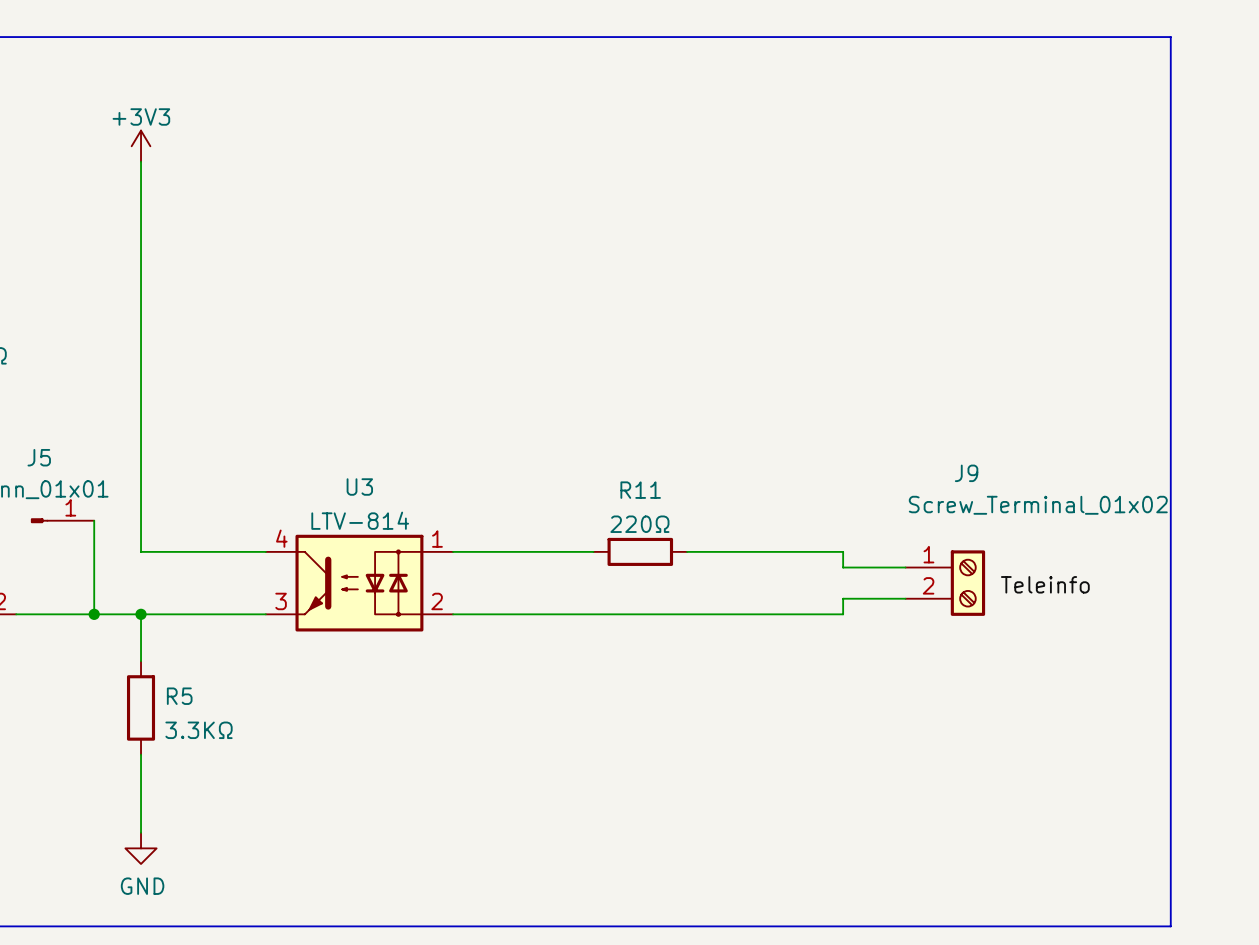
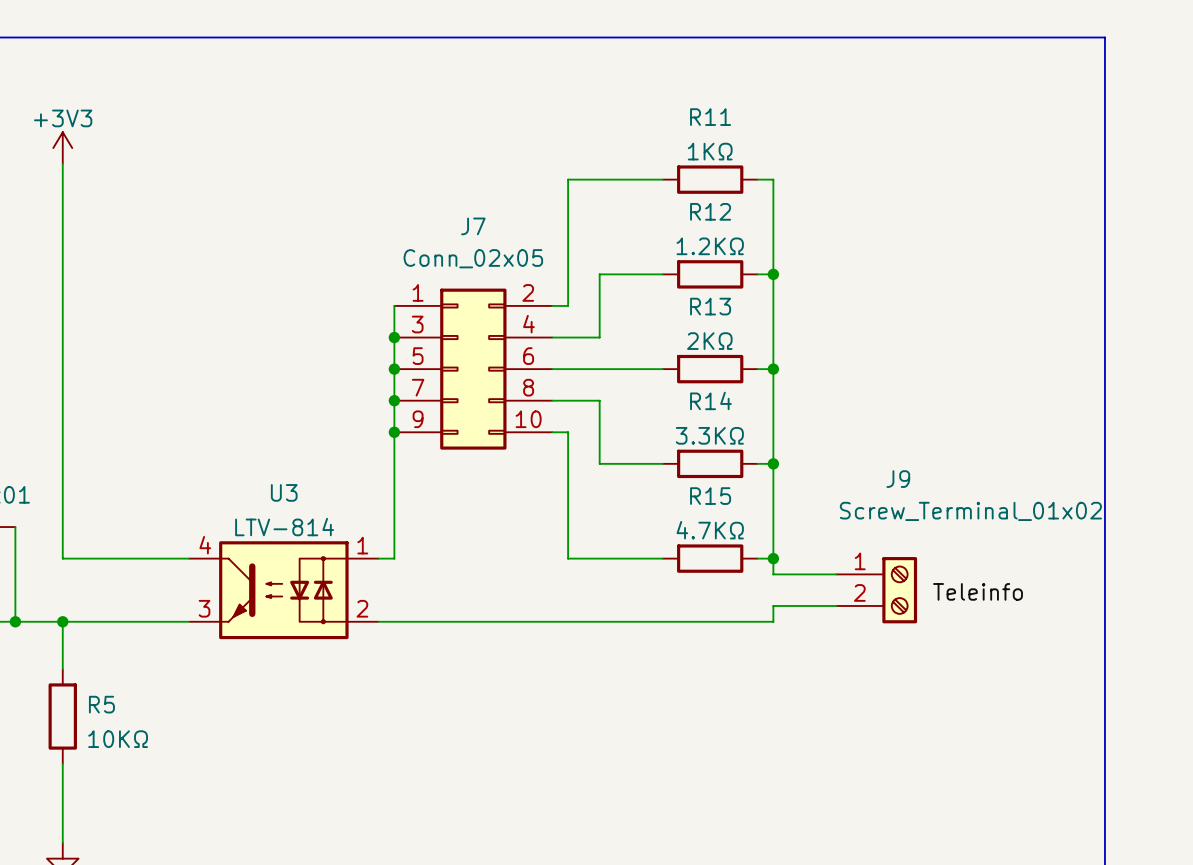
wire: none -> (662, 179) (568, 179) (568, 305) (552, 305)
wire: none -> (757, 179) (773, 179) (773, 558)
wire: none -> (662, 274) (599, 274) (599, 337) (552, 337)
R12: none -> 1.2KΩ (710, 274)
wire: none -> (757, 274) (773, 274)
junction: none -> (773, 274)
junction: none -> (394, 337)
junction: none -> (394, 369)
J7: none -> Conn_02x05 (473, 369)
wire: none -> (552, 369) (662, 369)
R13: none -> 2KΩ (710, 369)
wire: none -> (757, 369) (773, 369)
junction: none -> (773, 369)
junction: none -> (394, 400)
wire: none -> (552, 400) (599, 400) (599, 463) (662, 463)
junction: none -> (394, 432)
wire: none -> (552, 432) (568, 432) (568, 558) (615, 558)
R14: none -> 3.3KΩ (710, 463)
wire: none -> (757, 463) (773, 463)
junction: none -> (773, 463)
R11 value: 220Ω (639, 524) -> 1KΩ (710, 151)
wire: (468, 551) (593, 551) -> (394, 558) (394, 305)
R11 position: (640, 551) -> (710, 179)
wire: (733, 551) (827, 551) -> none
R15: none -> 4.7KΩ (710, 558)
junction: none -> (773, 558)
R5 value: 3.3KΩ (199, 730) -> 10KΩ (118, 739)

